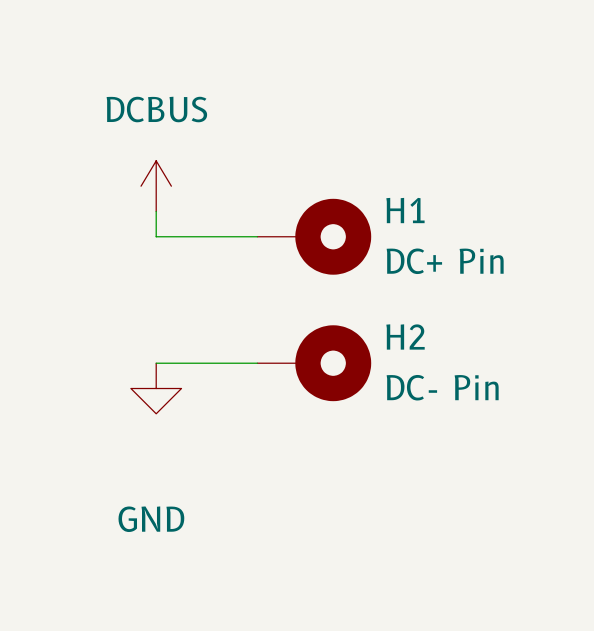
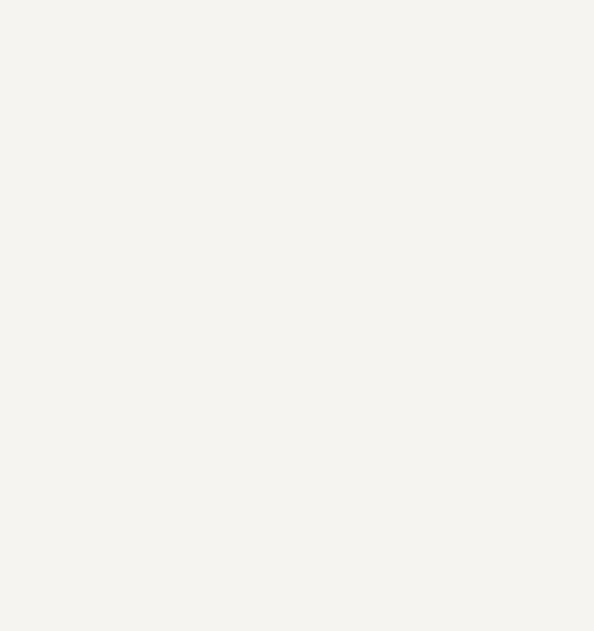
power symbol: DCBUS (156, 186) -> none
wire: (156, 211) (156, 236) (257, 236) -> none
H1: DC+ Pin (314, 236) -> none
wire: (156, 363) (257, 363) -> none
H2: DC- Pin (314, 363) -> none
power symbol: GND (156, 388) -> none

